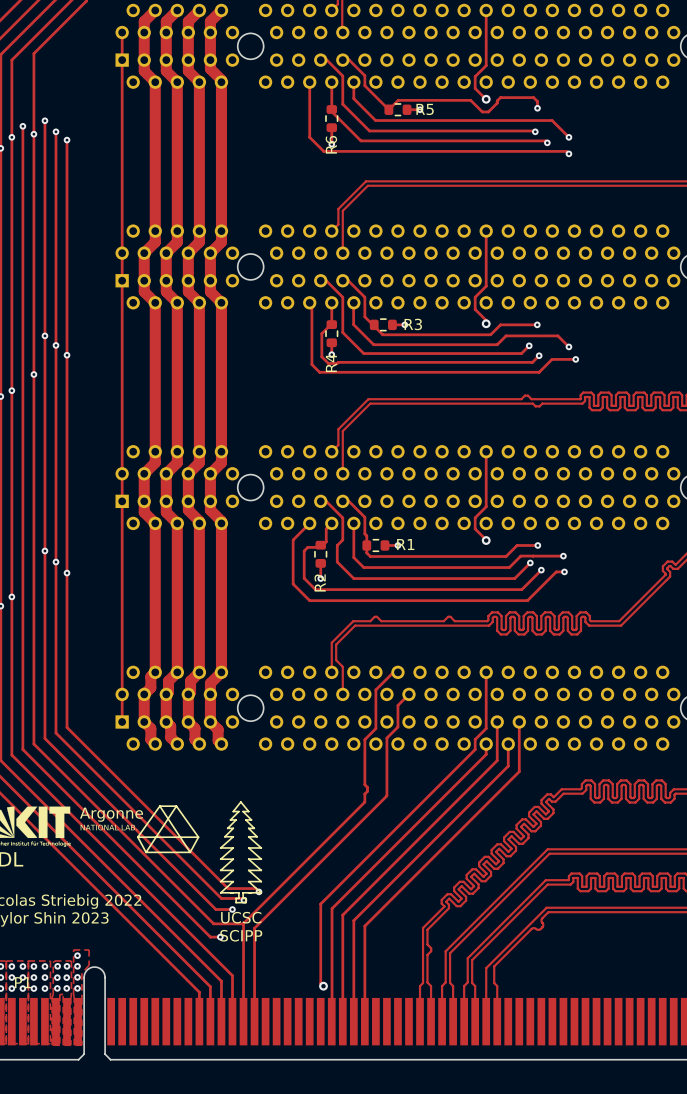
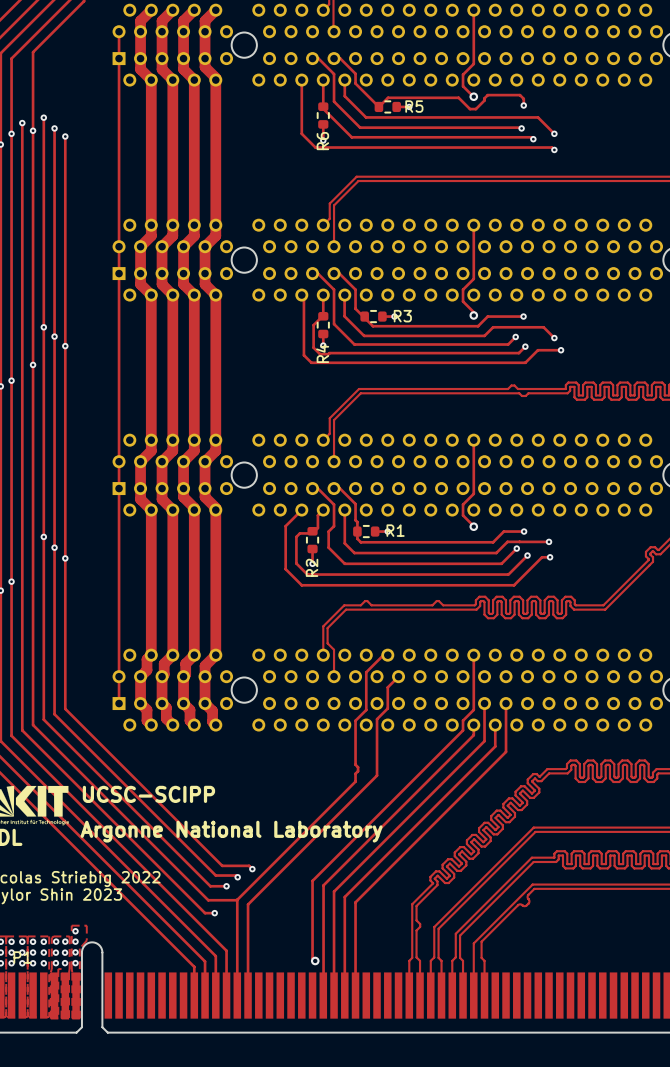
drawing: [219, 801, 263, 904] -> none
drawing: [137, 805, 200, 854] -> none
text: none -> UCSC-SCIPP (148, 794)
text: none -> Argonne National Laboratory (231, 831)
text: UCSC (241, 917) -> none
text: SCIPP (241, 935) -> none

